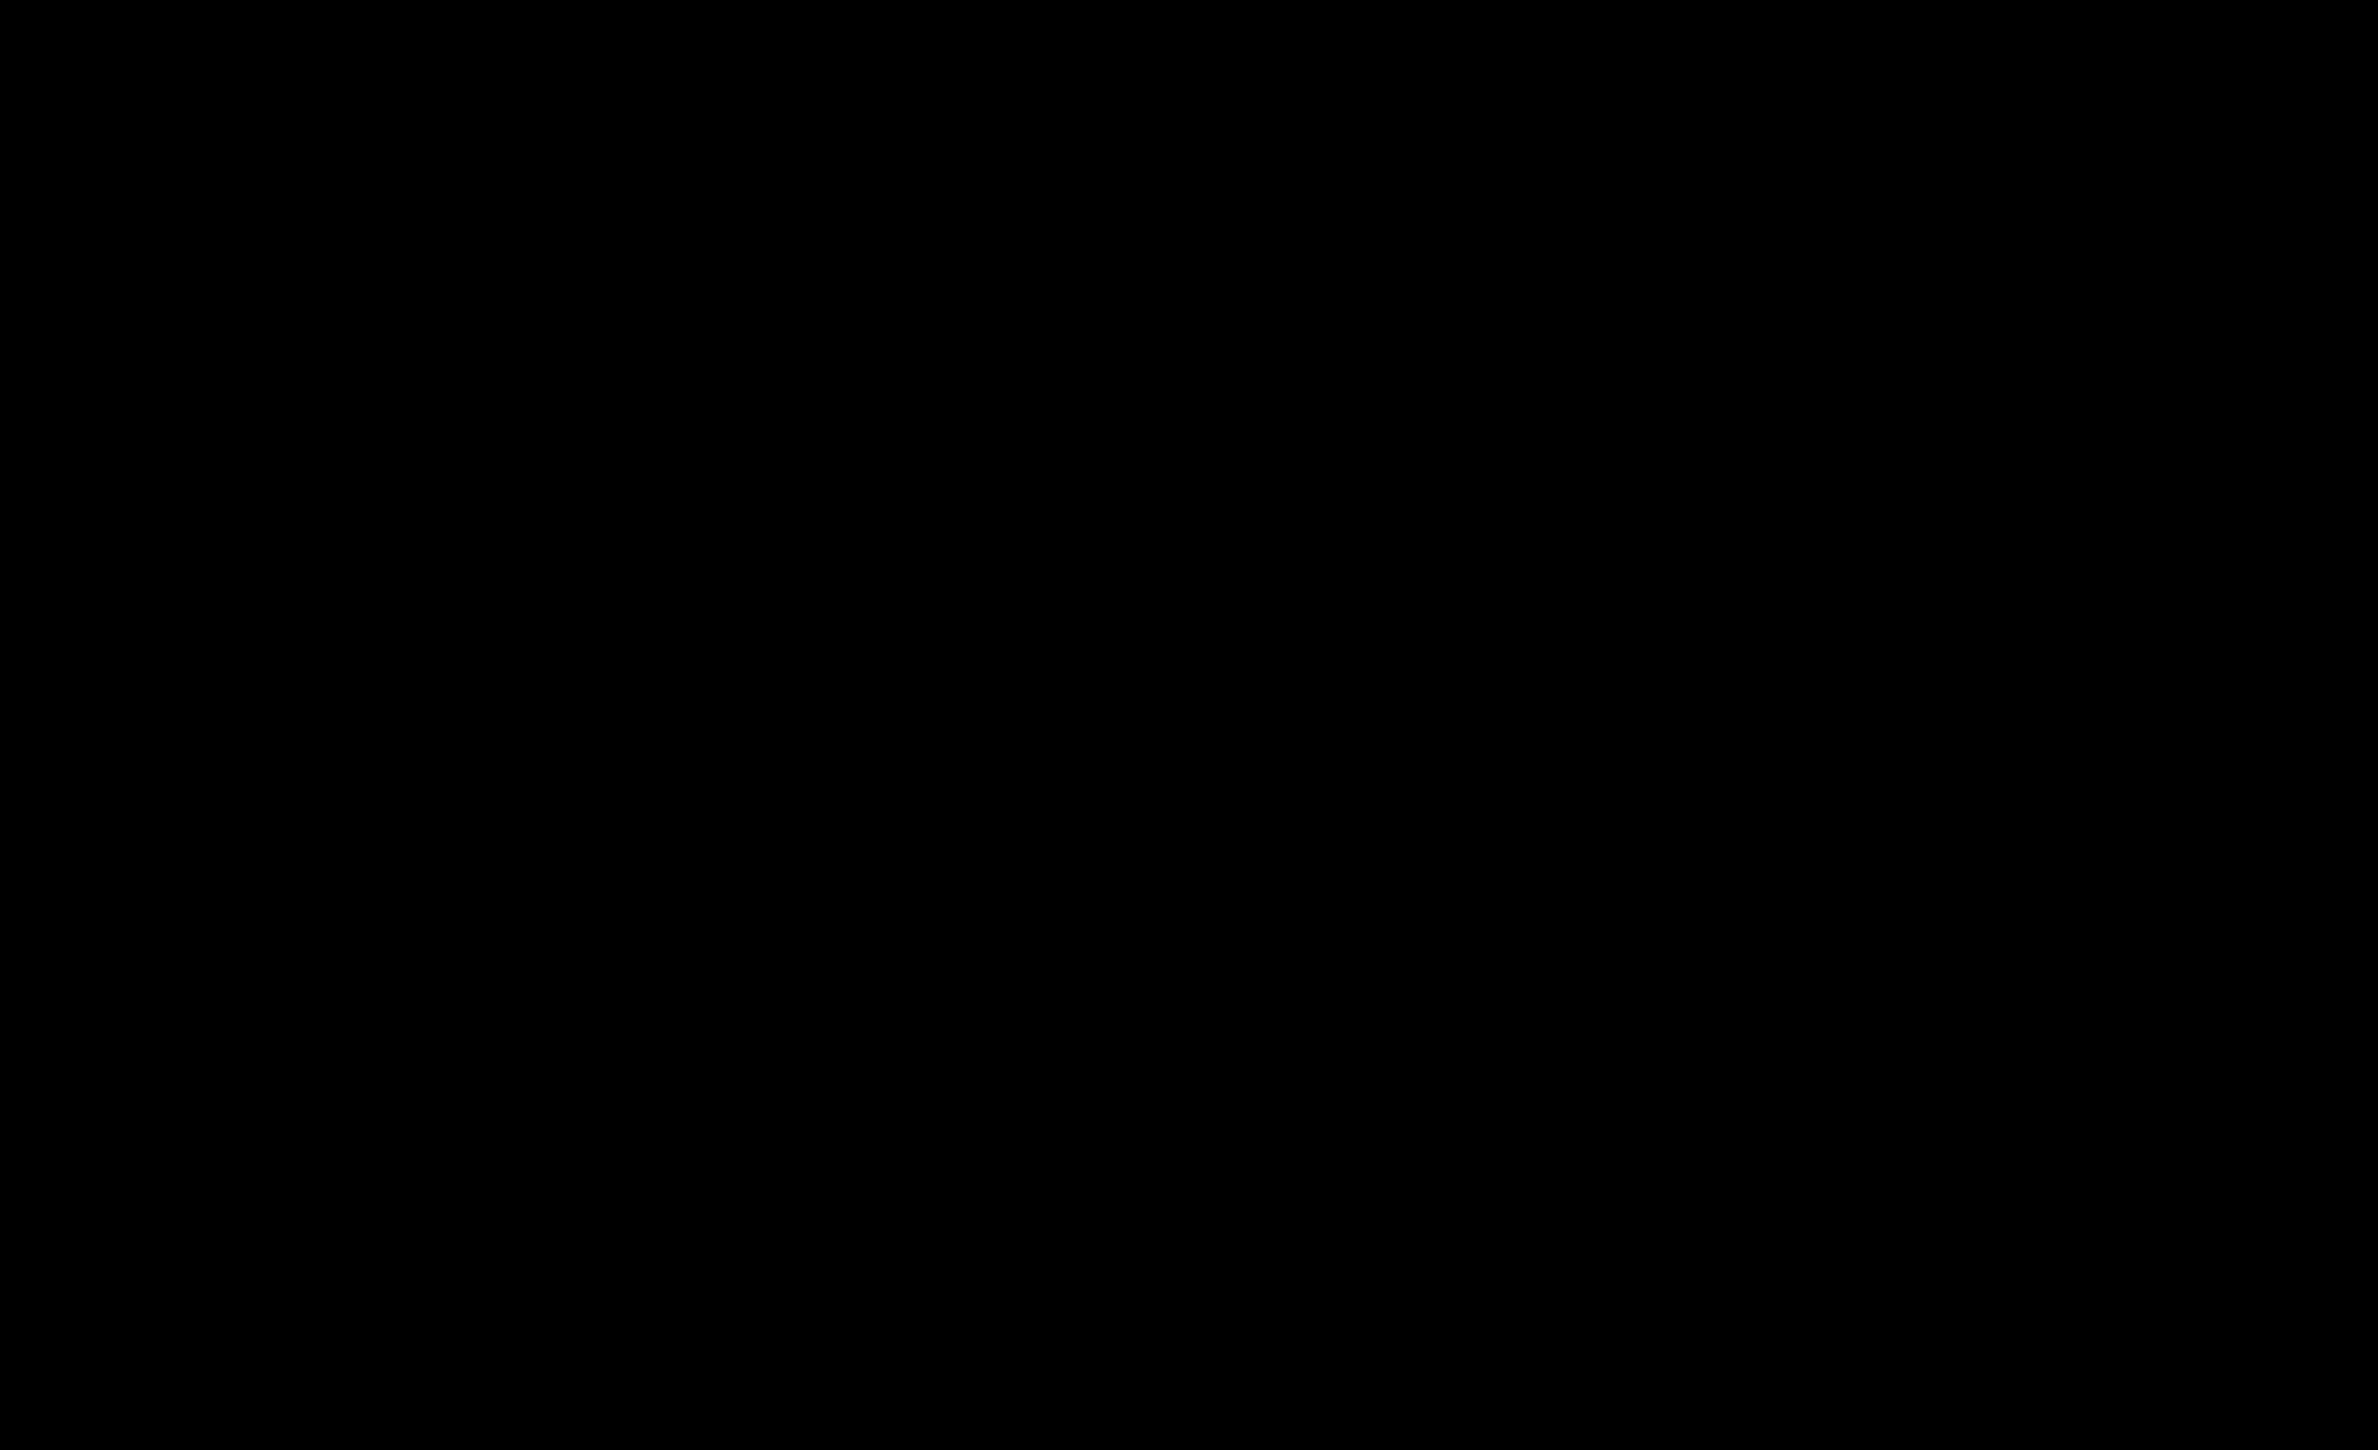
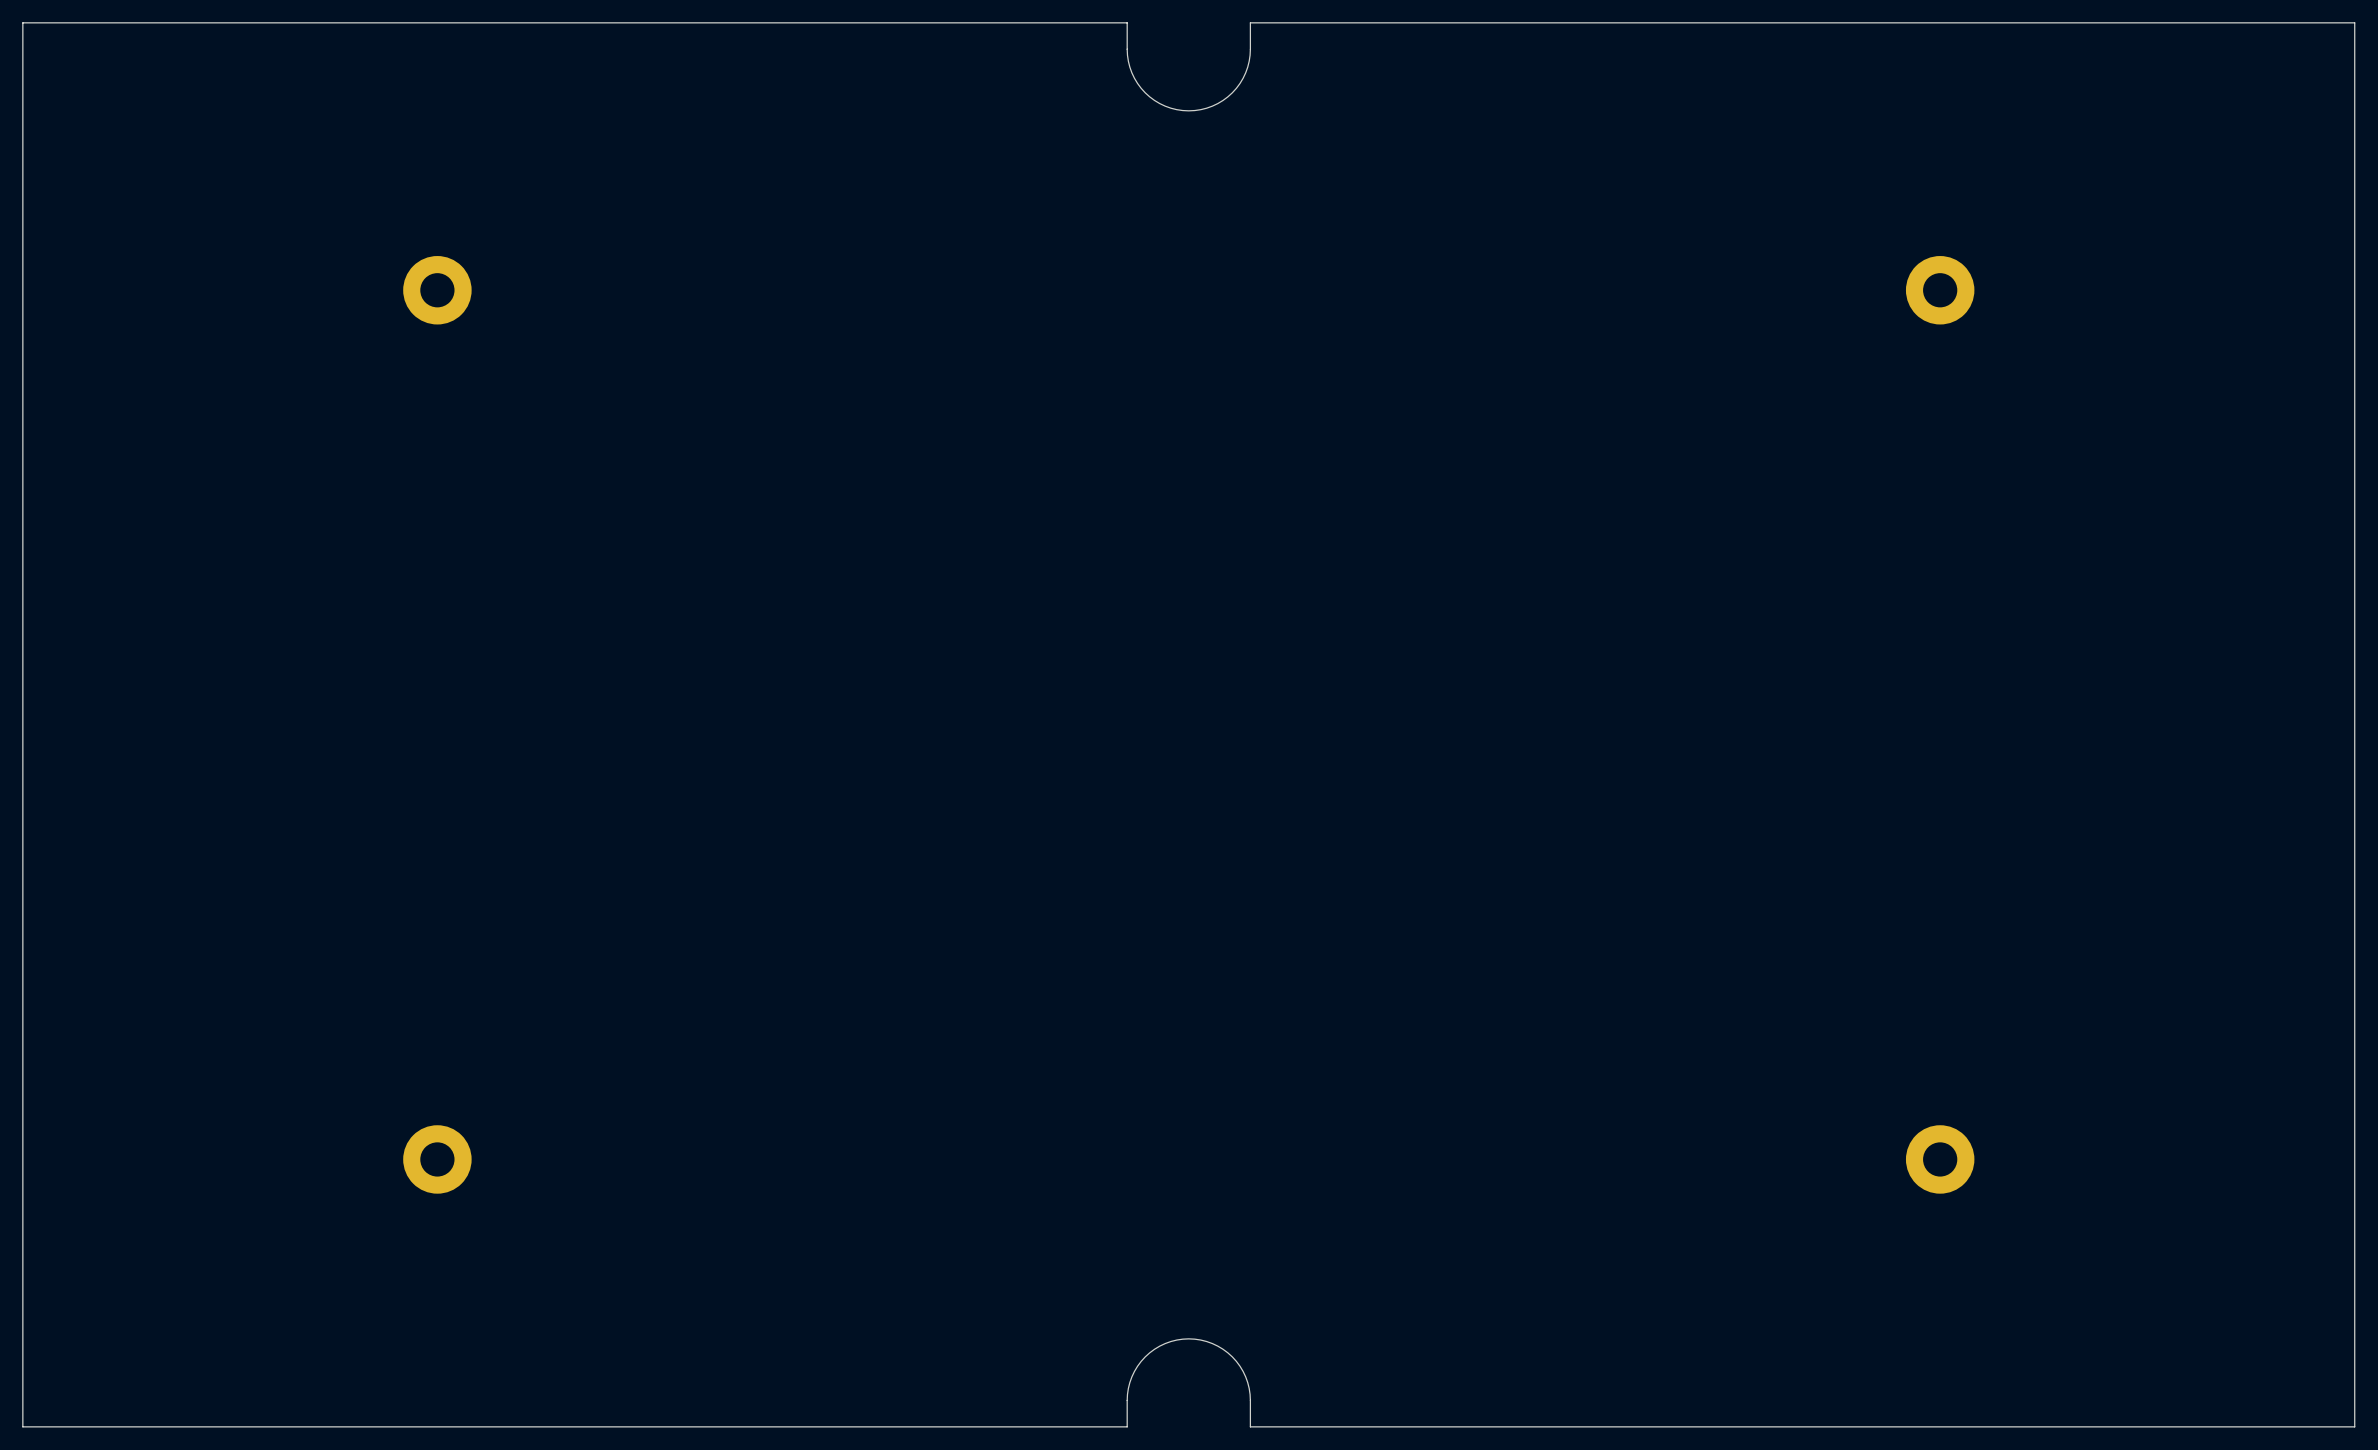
board edge: none -> (22, 22) (1127, 22) (1128, 61) (1137, 83) (1149, 96) (1159, 103) (1176, 109) (1188, 110) (1200, 109) (1217, 103) (1227, 96) (1240, 83) (1249, 61) (1250, 22) (2354, 22) (2354, 1426) (1250, 1426) (1249, 1388) (1240, 1366) (1227, 1352) (1217, 1346) (1200, 1340) (1188, 1338) (1176, 1340) (1159, 1346) (1149, 1352) (1137, 1366) (1128, 1388) (1127, 1426) (22, 1426) (22, 22)
part: none -> (437, 290)
part: none -> (1940, 290)
part: none -> (437, 1159)
part: none -> (1940, 1159)

